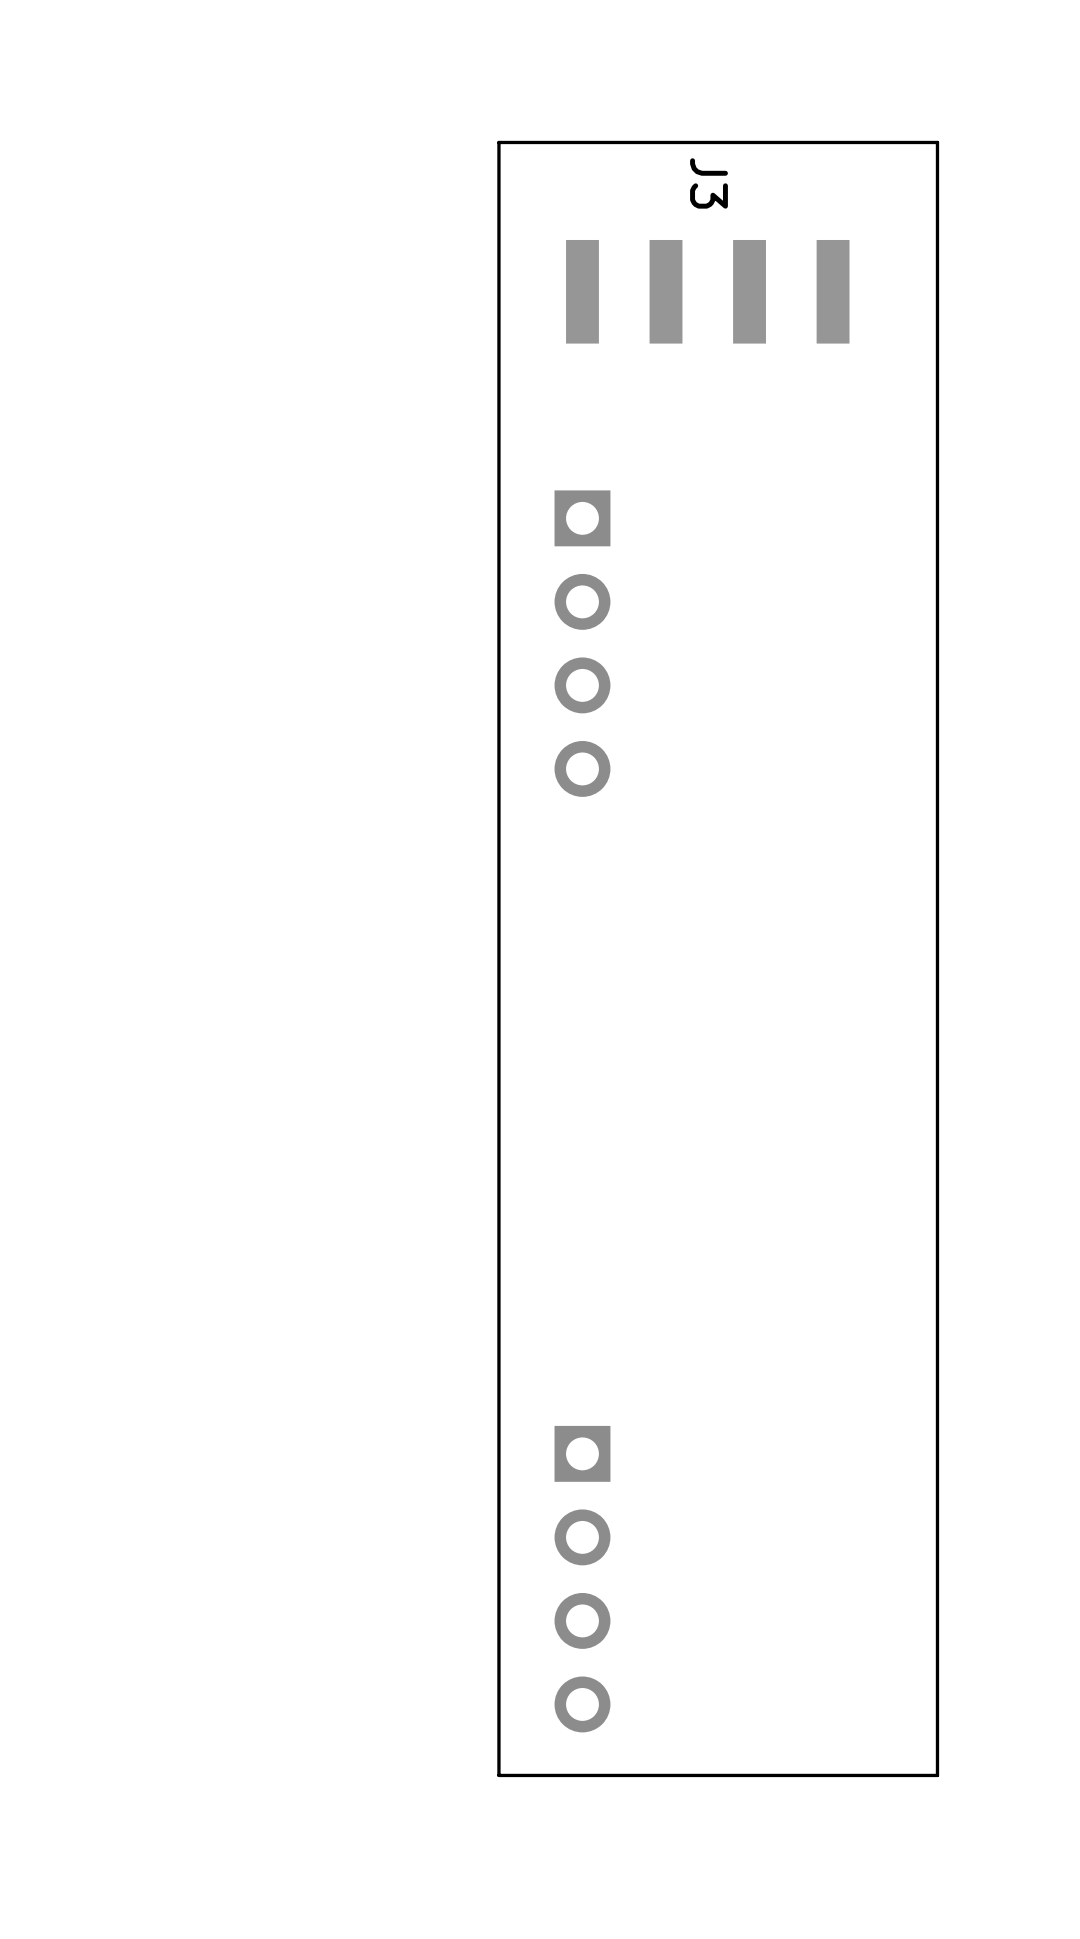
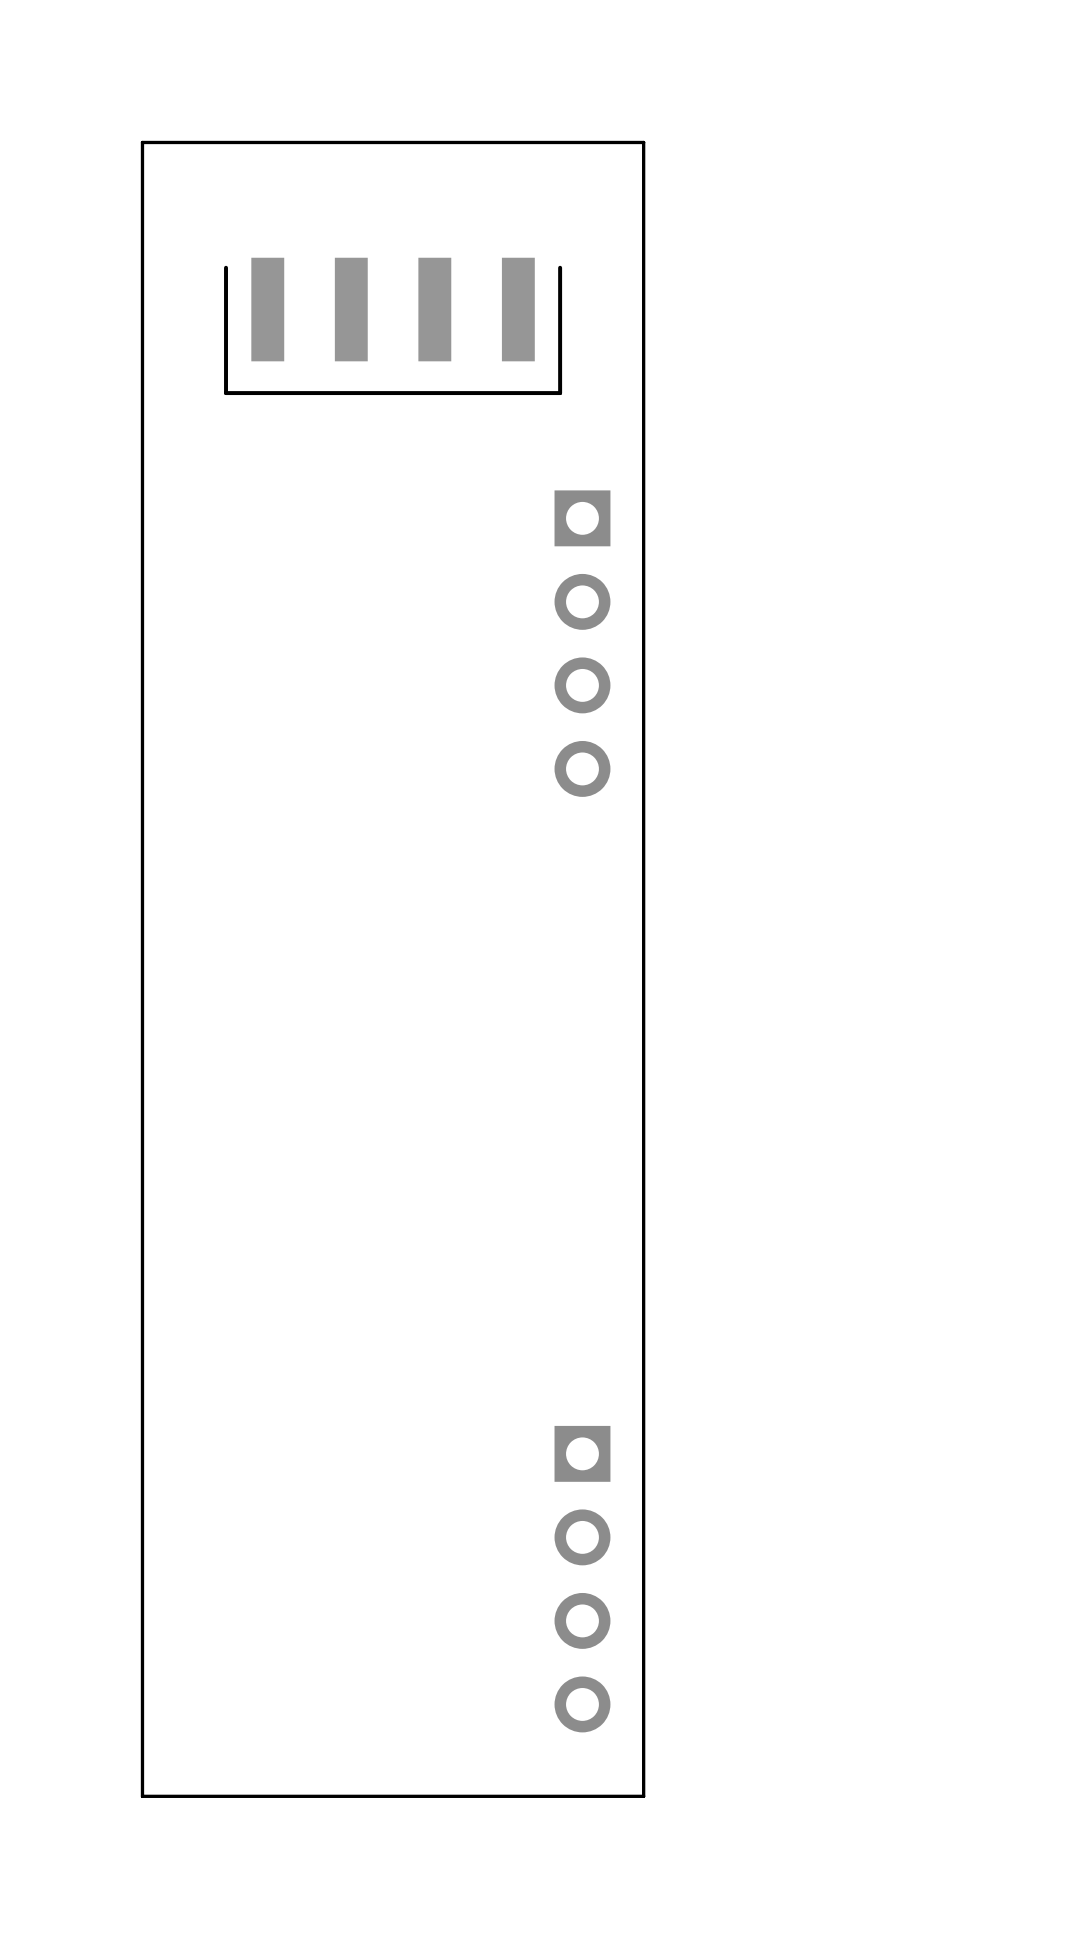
board edge: (643, 142) (937, 142) (937, 1775) (498, 1775) (498, 142) -> (643, 142) (643, 1796) (142, 1796) (142, 142) (498, 142)
J3 side: top (707, 291) -> bottom (393, 326)

